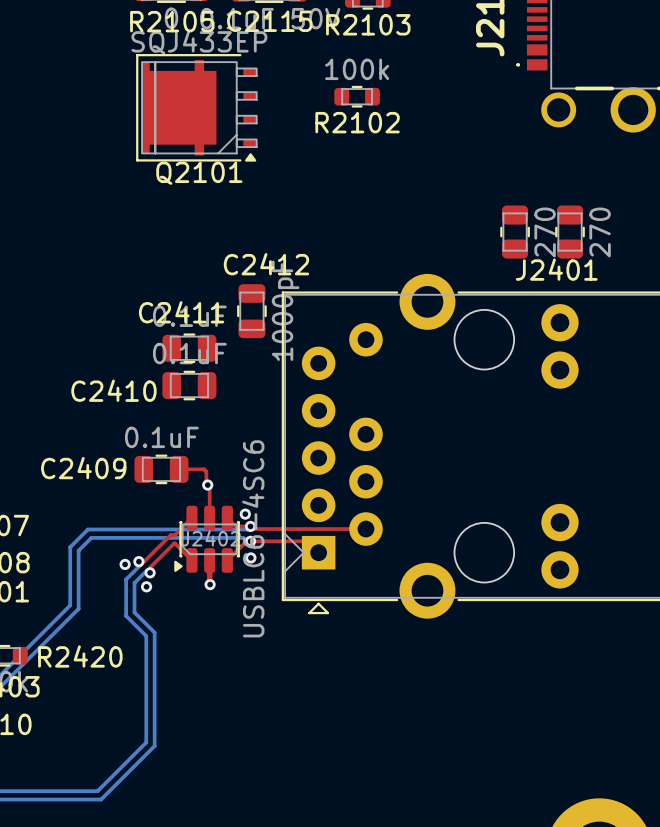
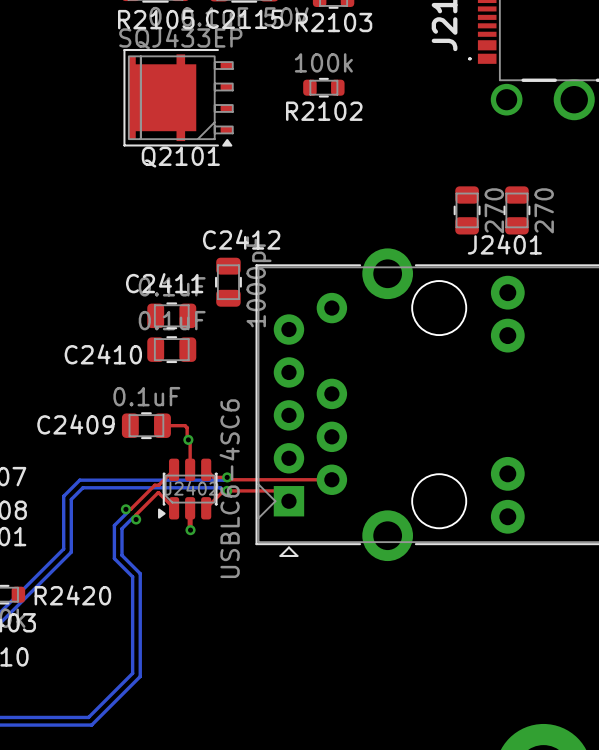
via: (245, 514) -> none
via: (250, 557) -> none
via: (125, 564) -> none
via: (146, 586) -> none

